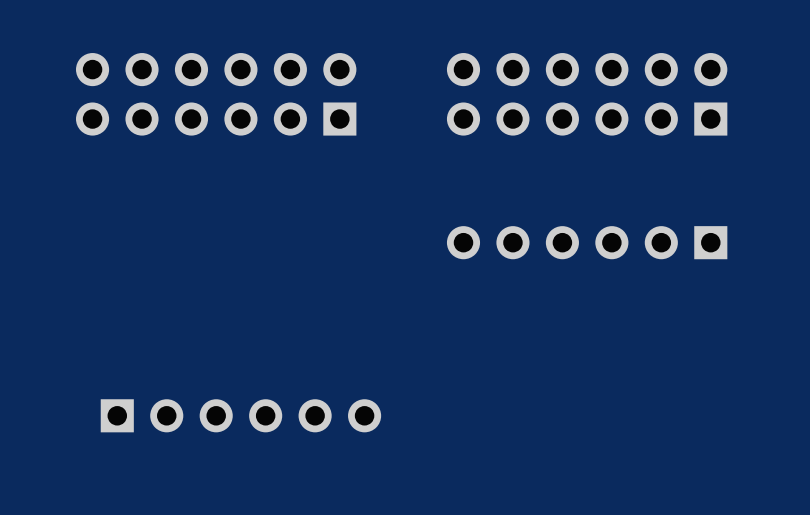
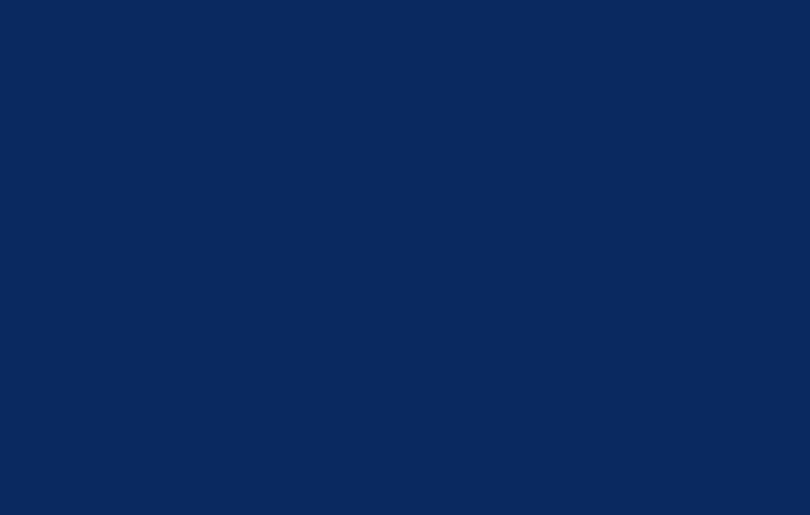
part: (216, 94) -> none
part: (587, 94) -> none
part: (587, 242) -> none
part: (240, 415) -> none

